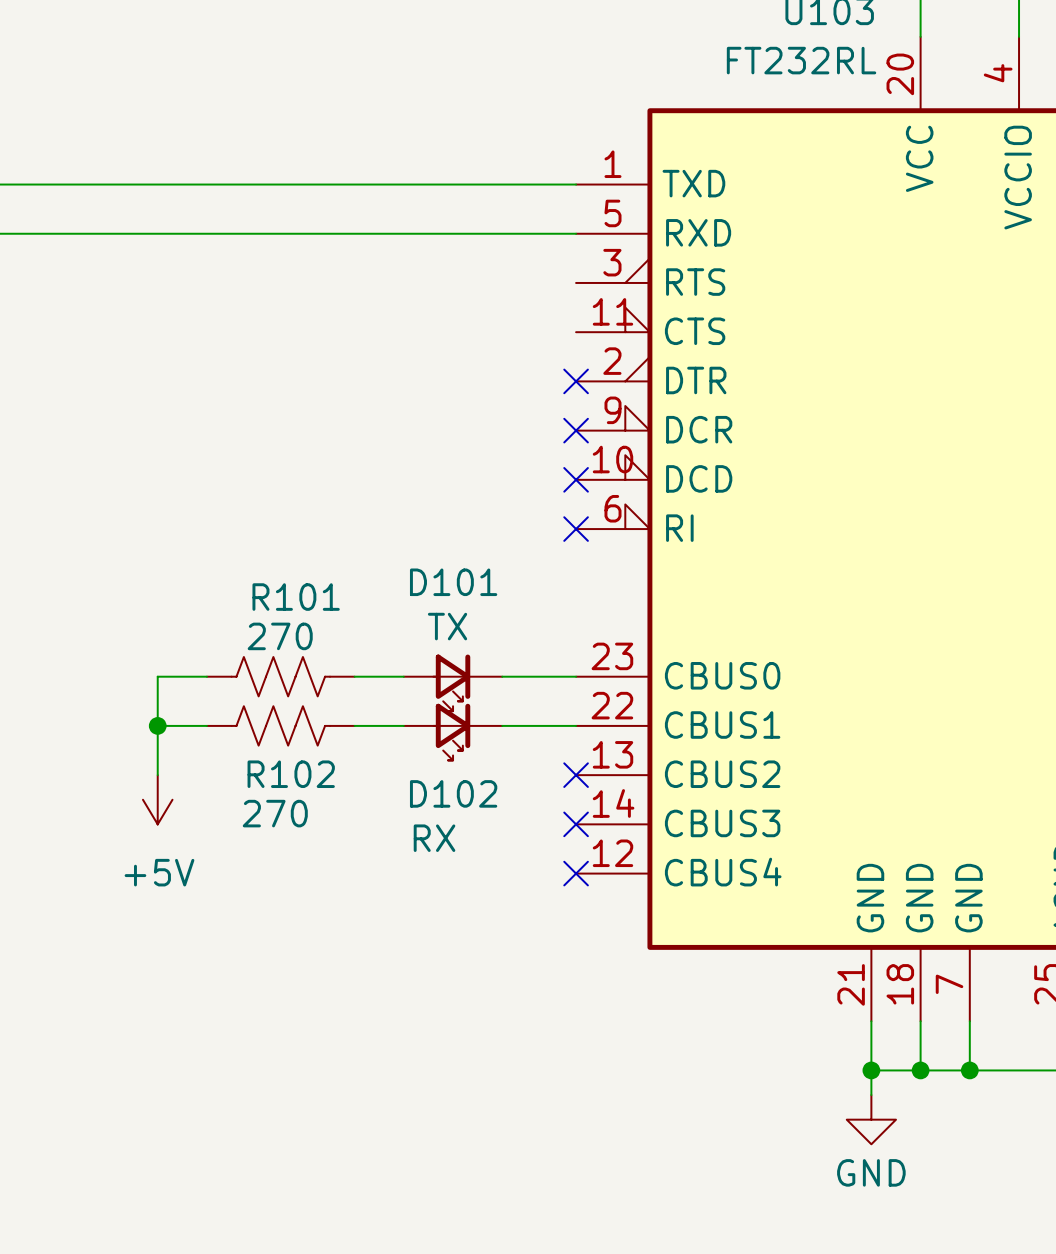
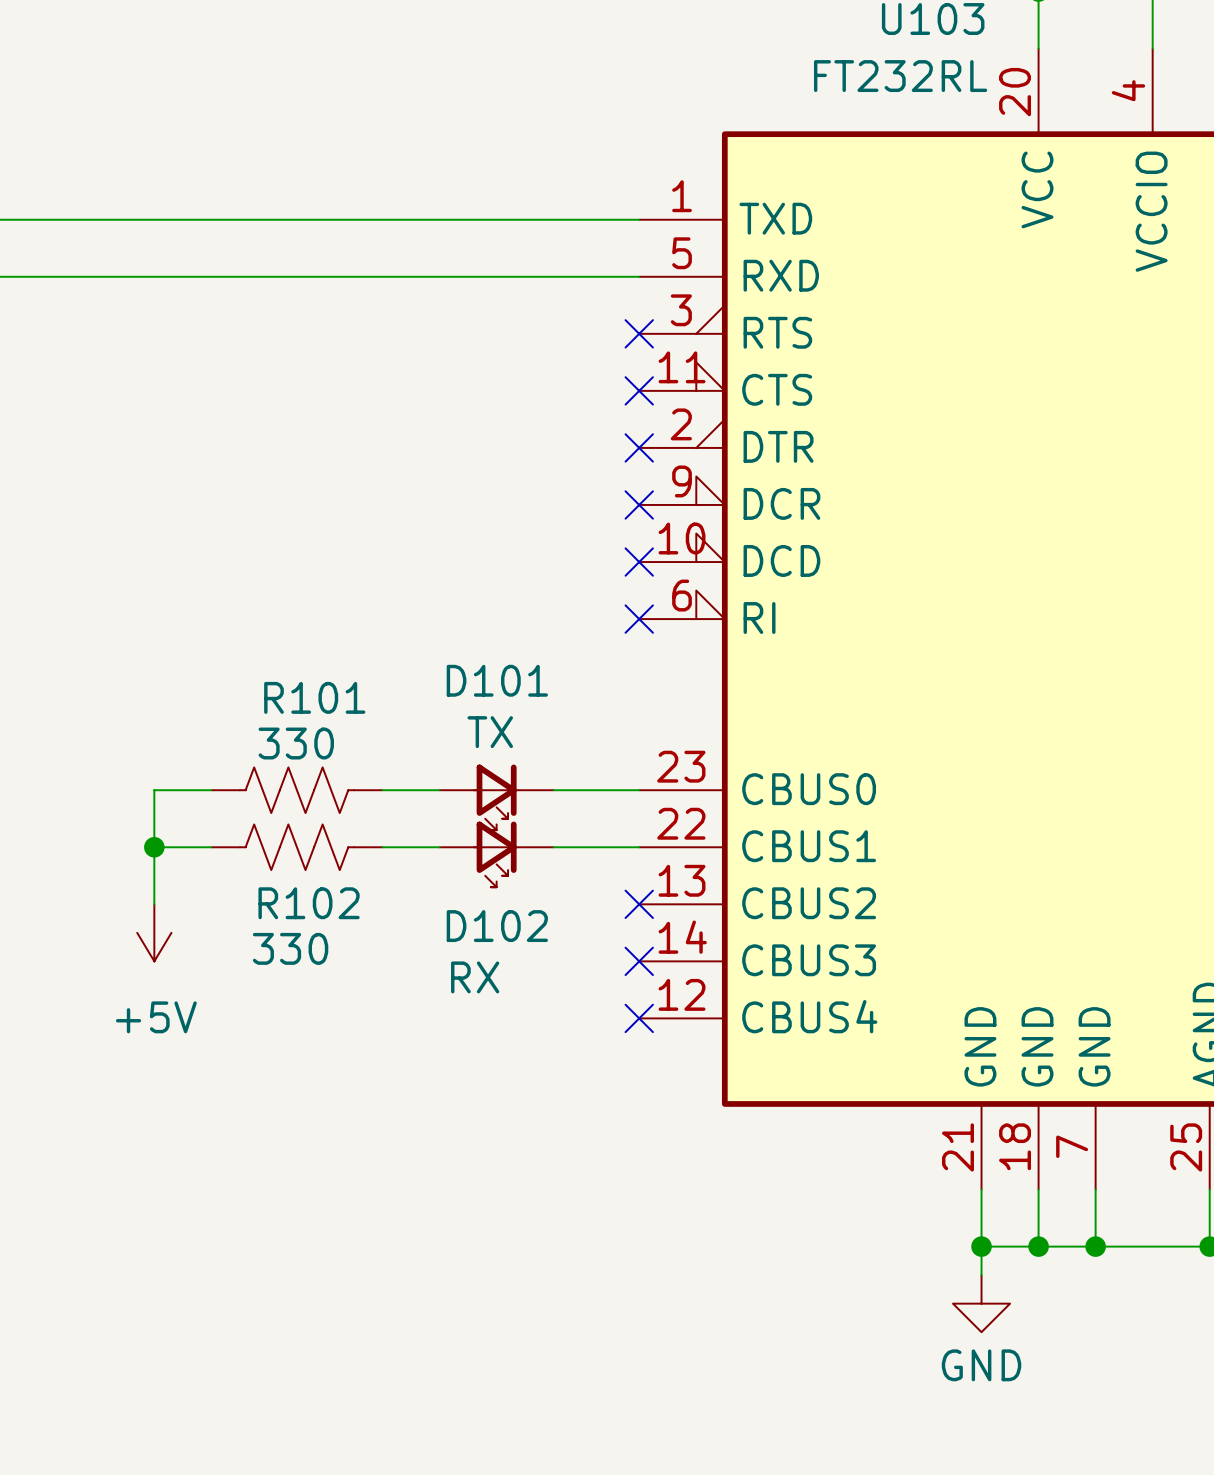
no-connect mark: none -> (639, 333)
no-connect mark: none -> (639, 390)
R101 value: 270 (280, 636) -> 330 (296, 743)
R102 value: 270 (275, 813) -> 330 (290, 948)

